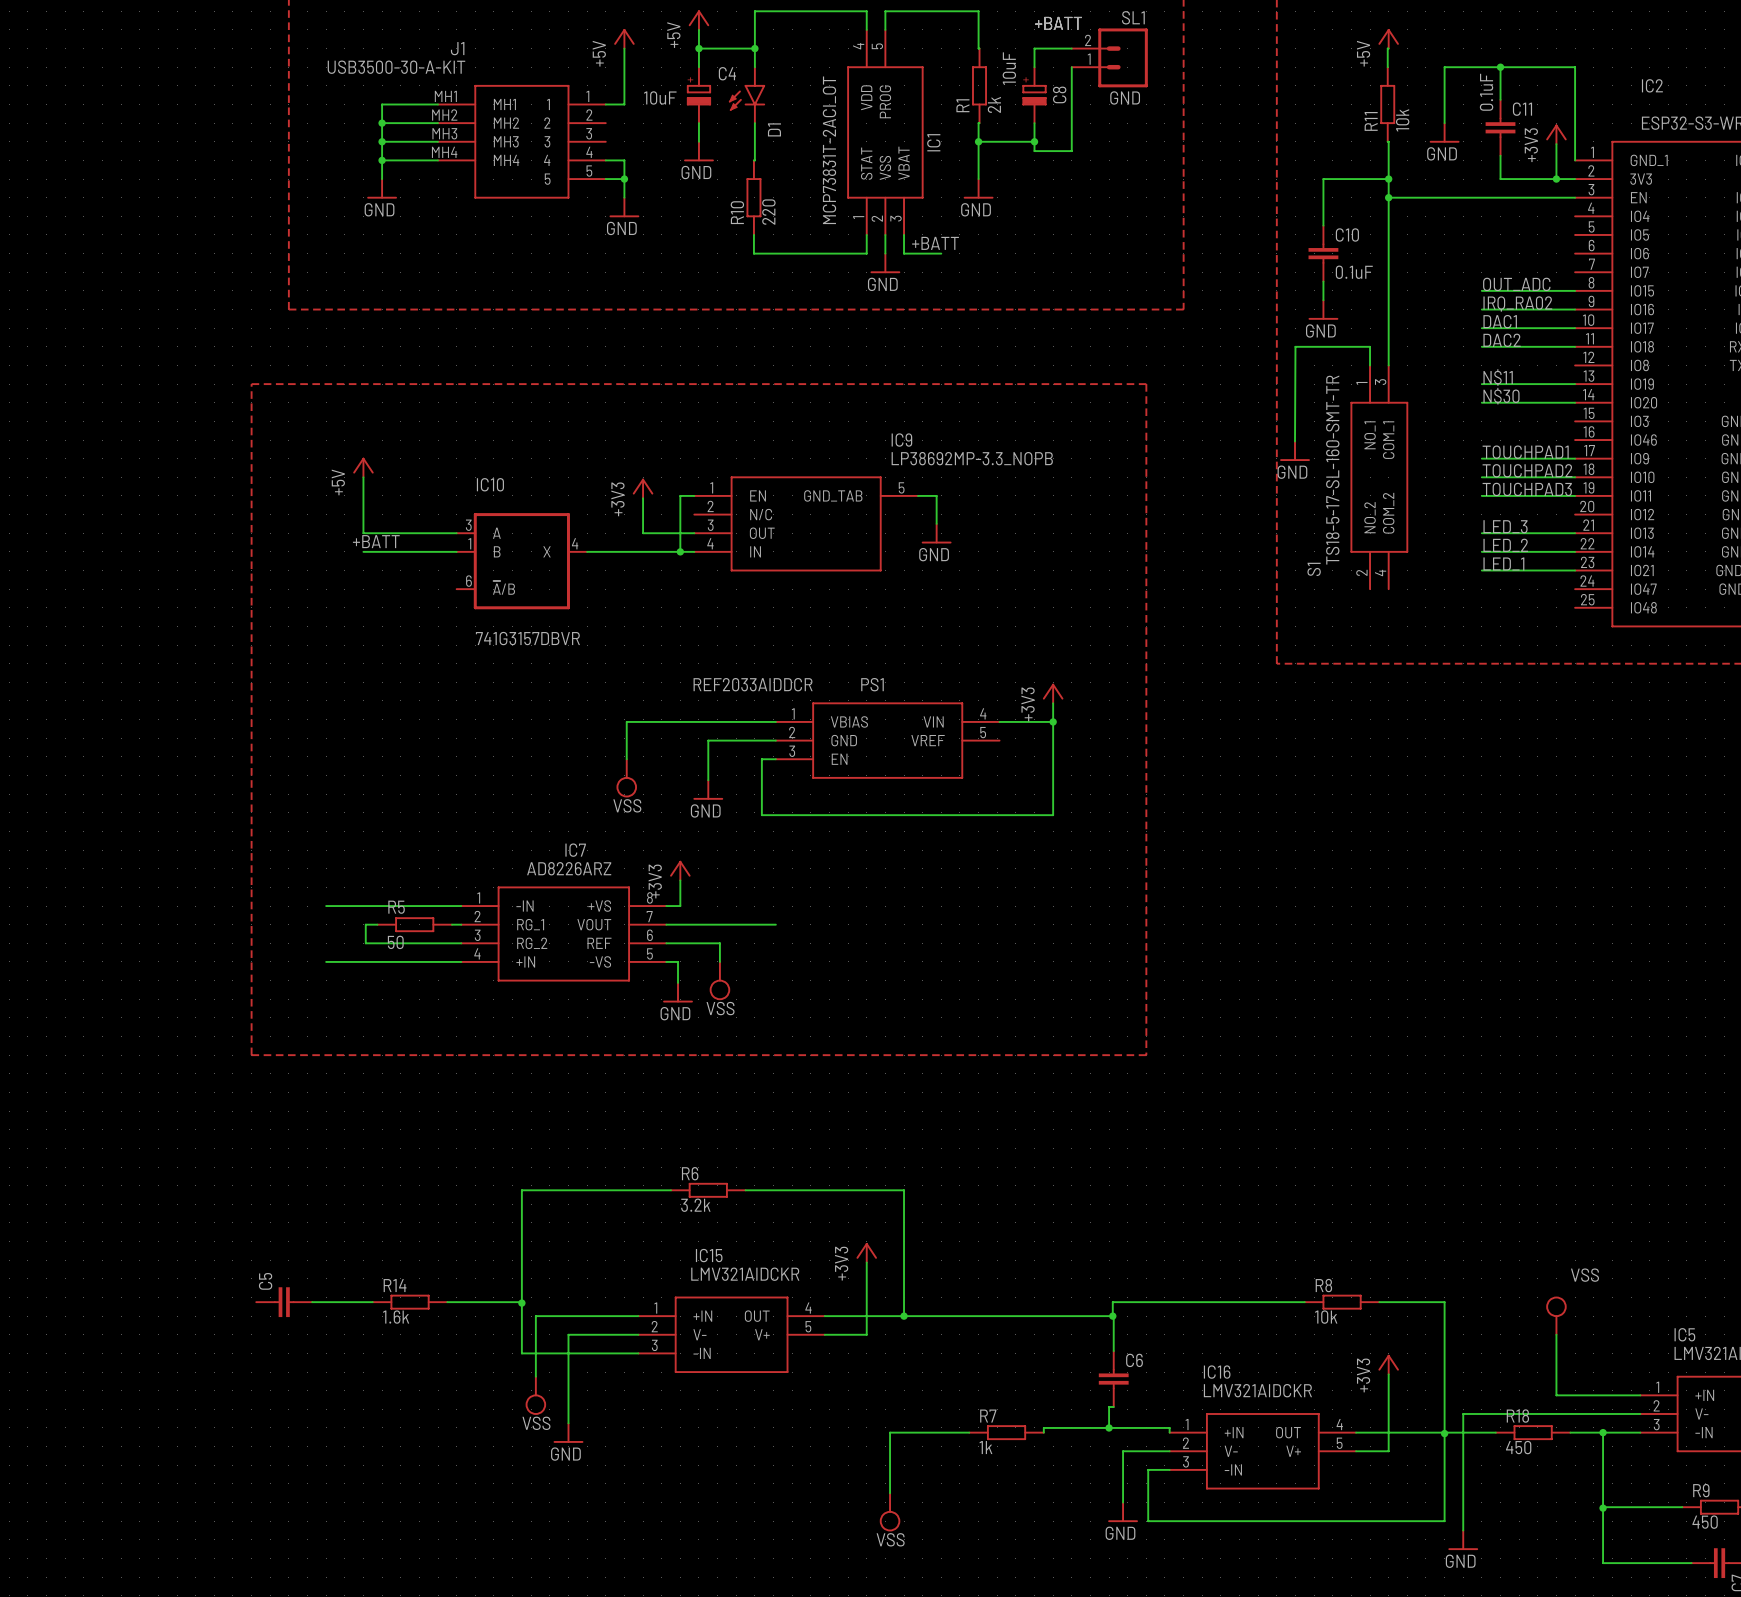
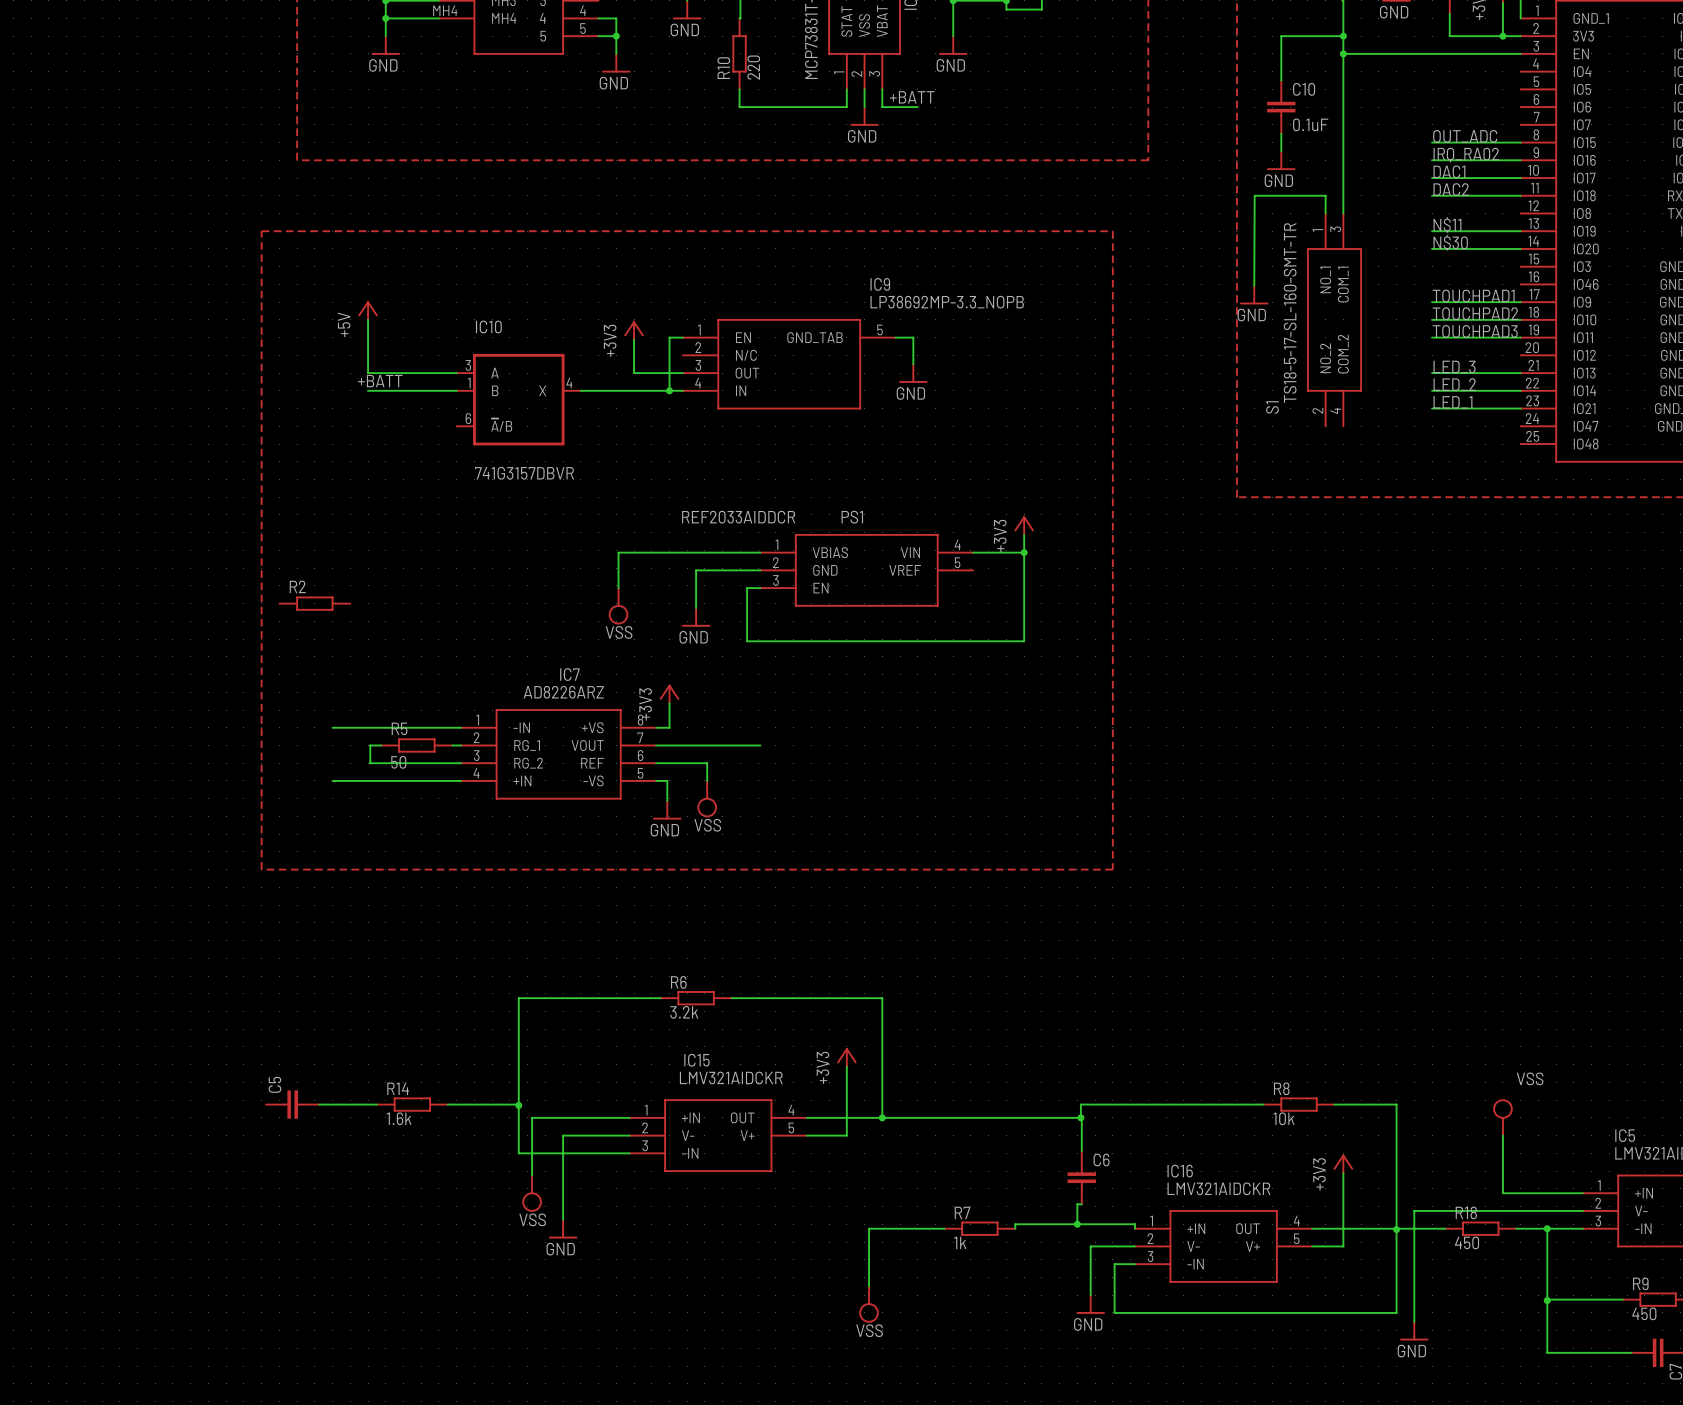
R2: none -> (314, 603)

